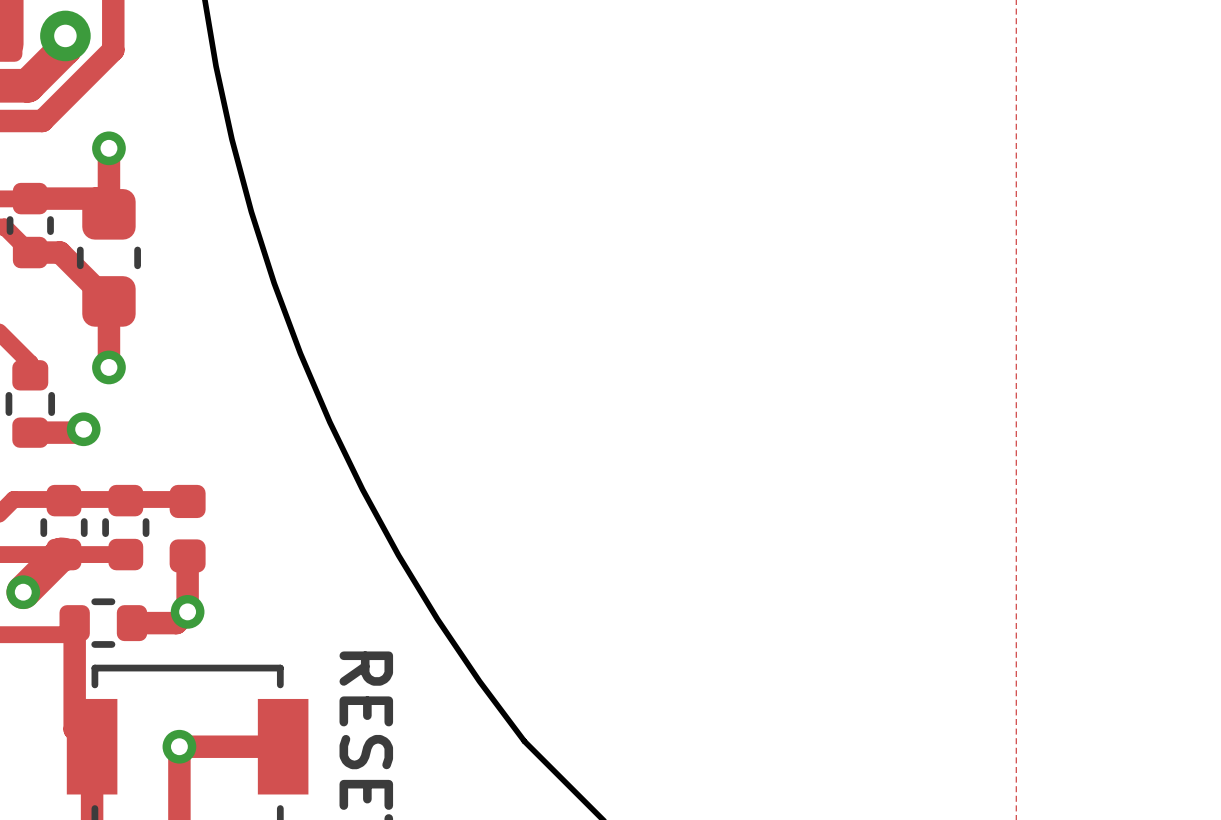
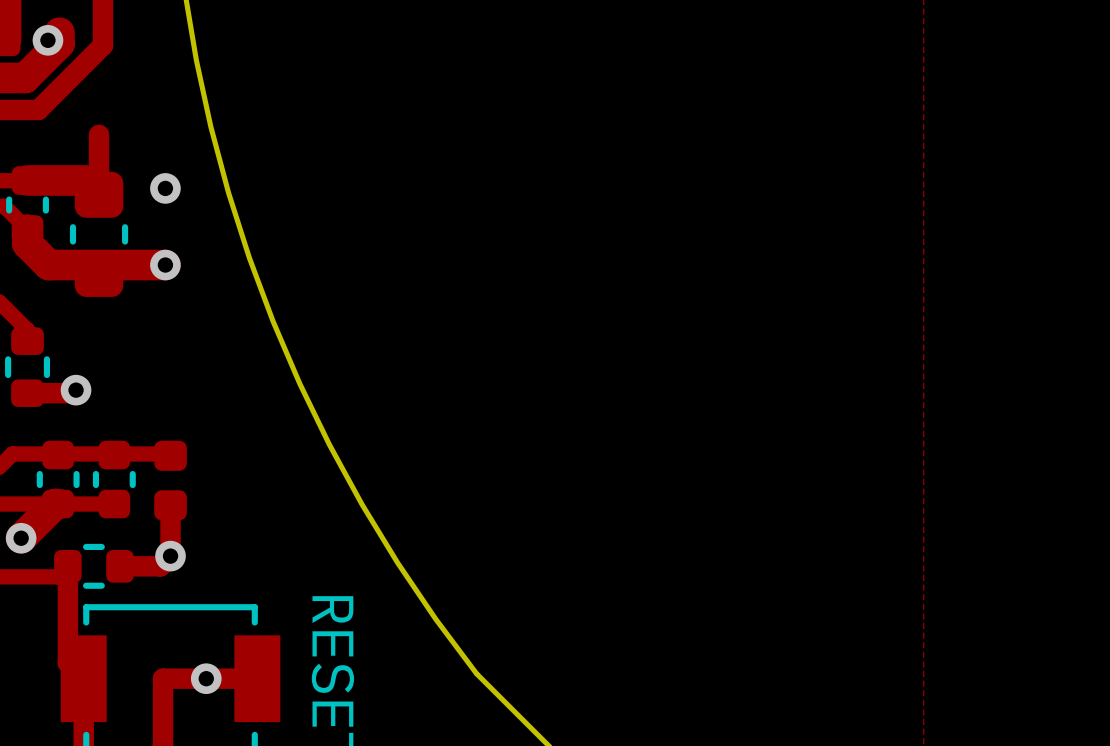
via size: [40, 10, 91, 62] -> [32, 25, 64, 56]
via: (108, 148) -> none
track width: thin (30, 198) (94, 198) -> thick (27, 180) (86, 180)
via: none -> (165, 188)
track: (30, 252) (60, 252) (108, 301) (108, 367) -> (27, 229) (27, 243) (48, 265) (165, 265)
via: none -> (165, 265)
via: (108, 367) -> none
via position: (179, 746) -> (206, 678)

